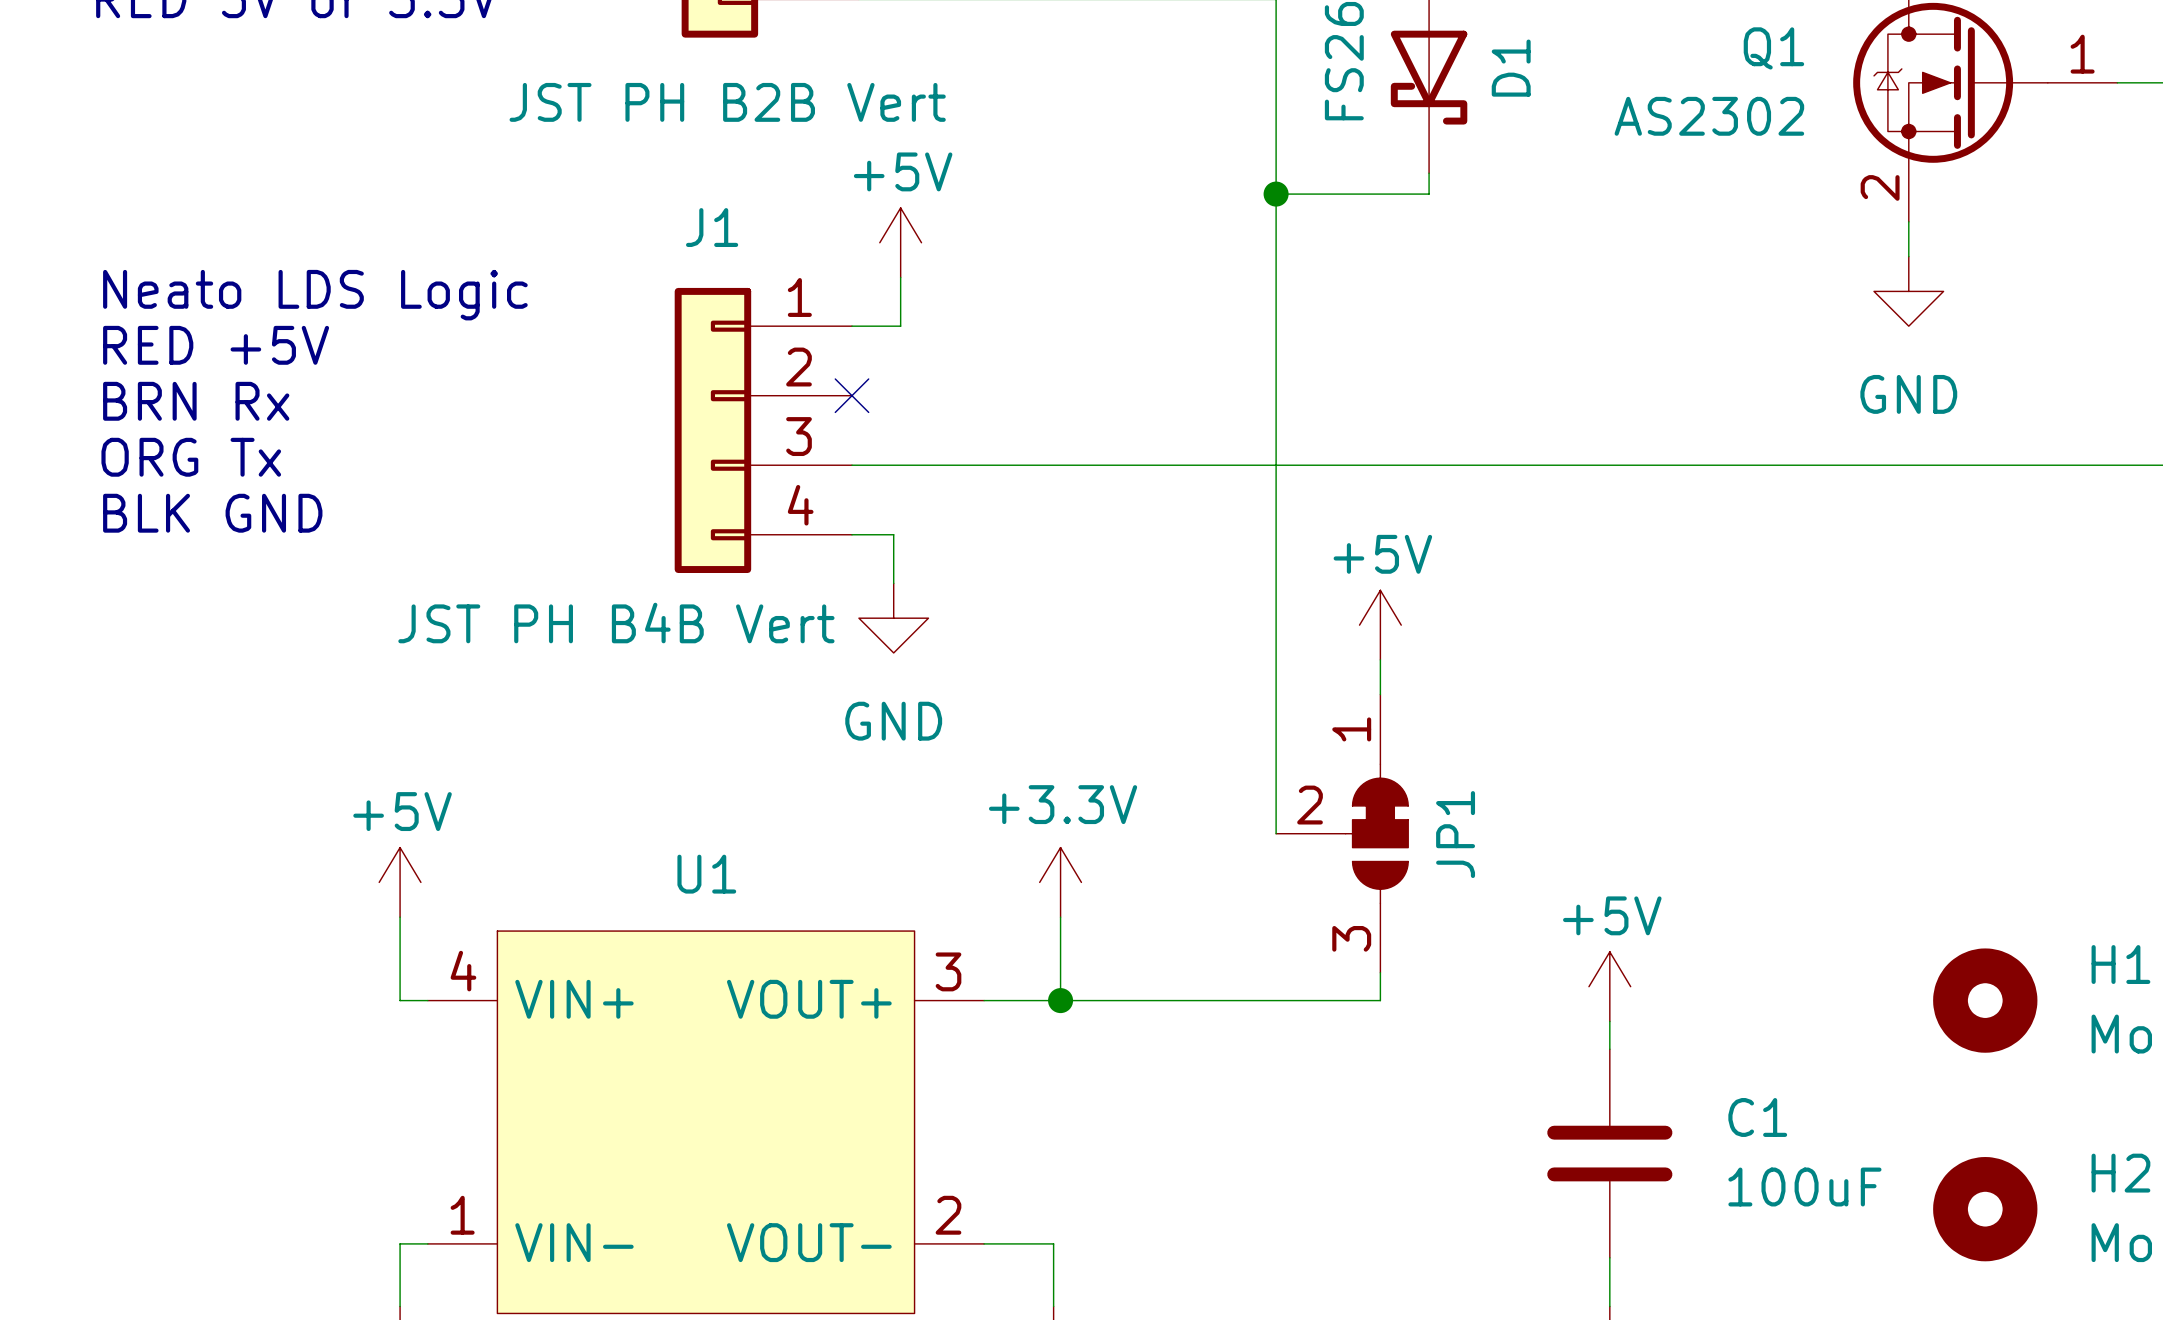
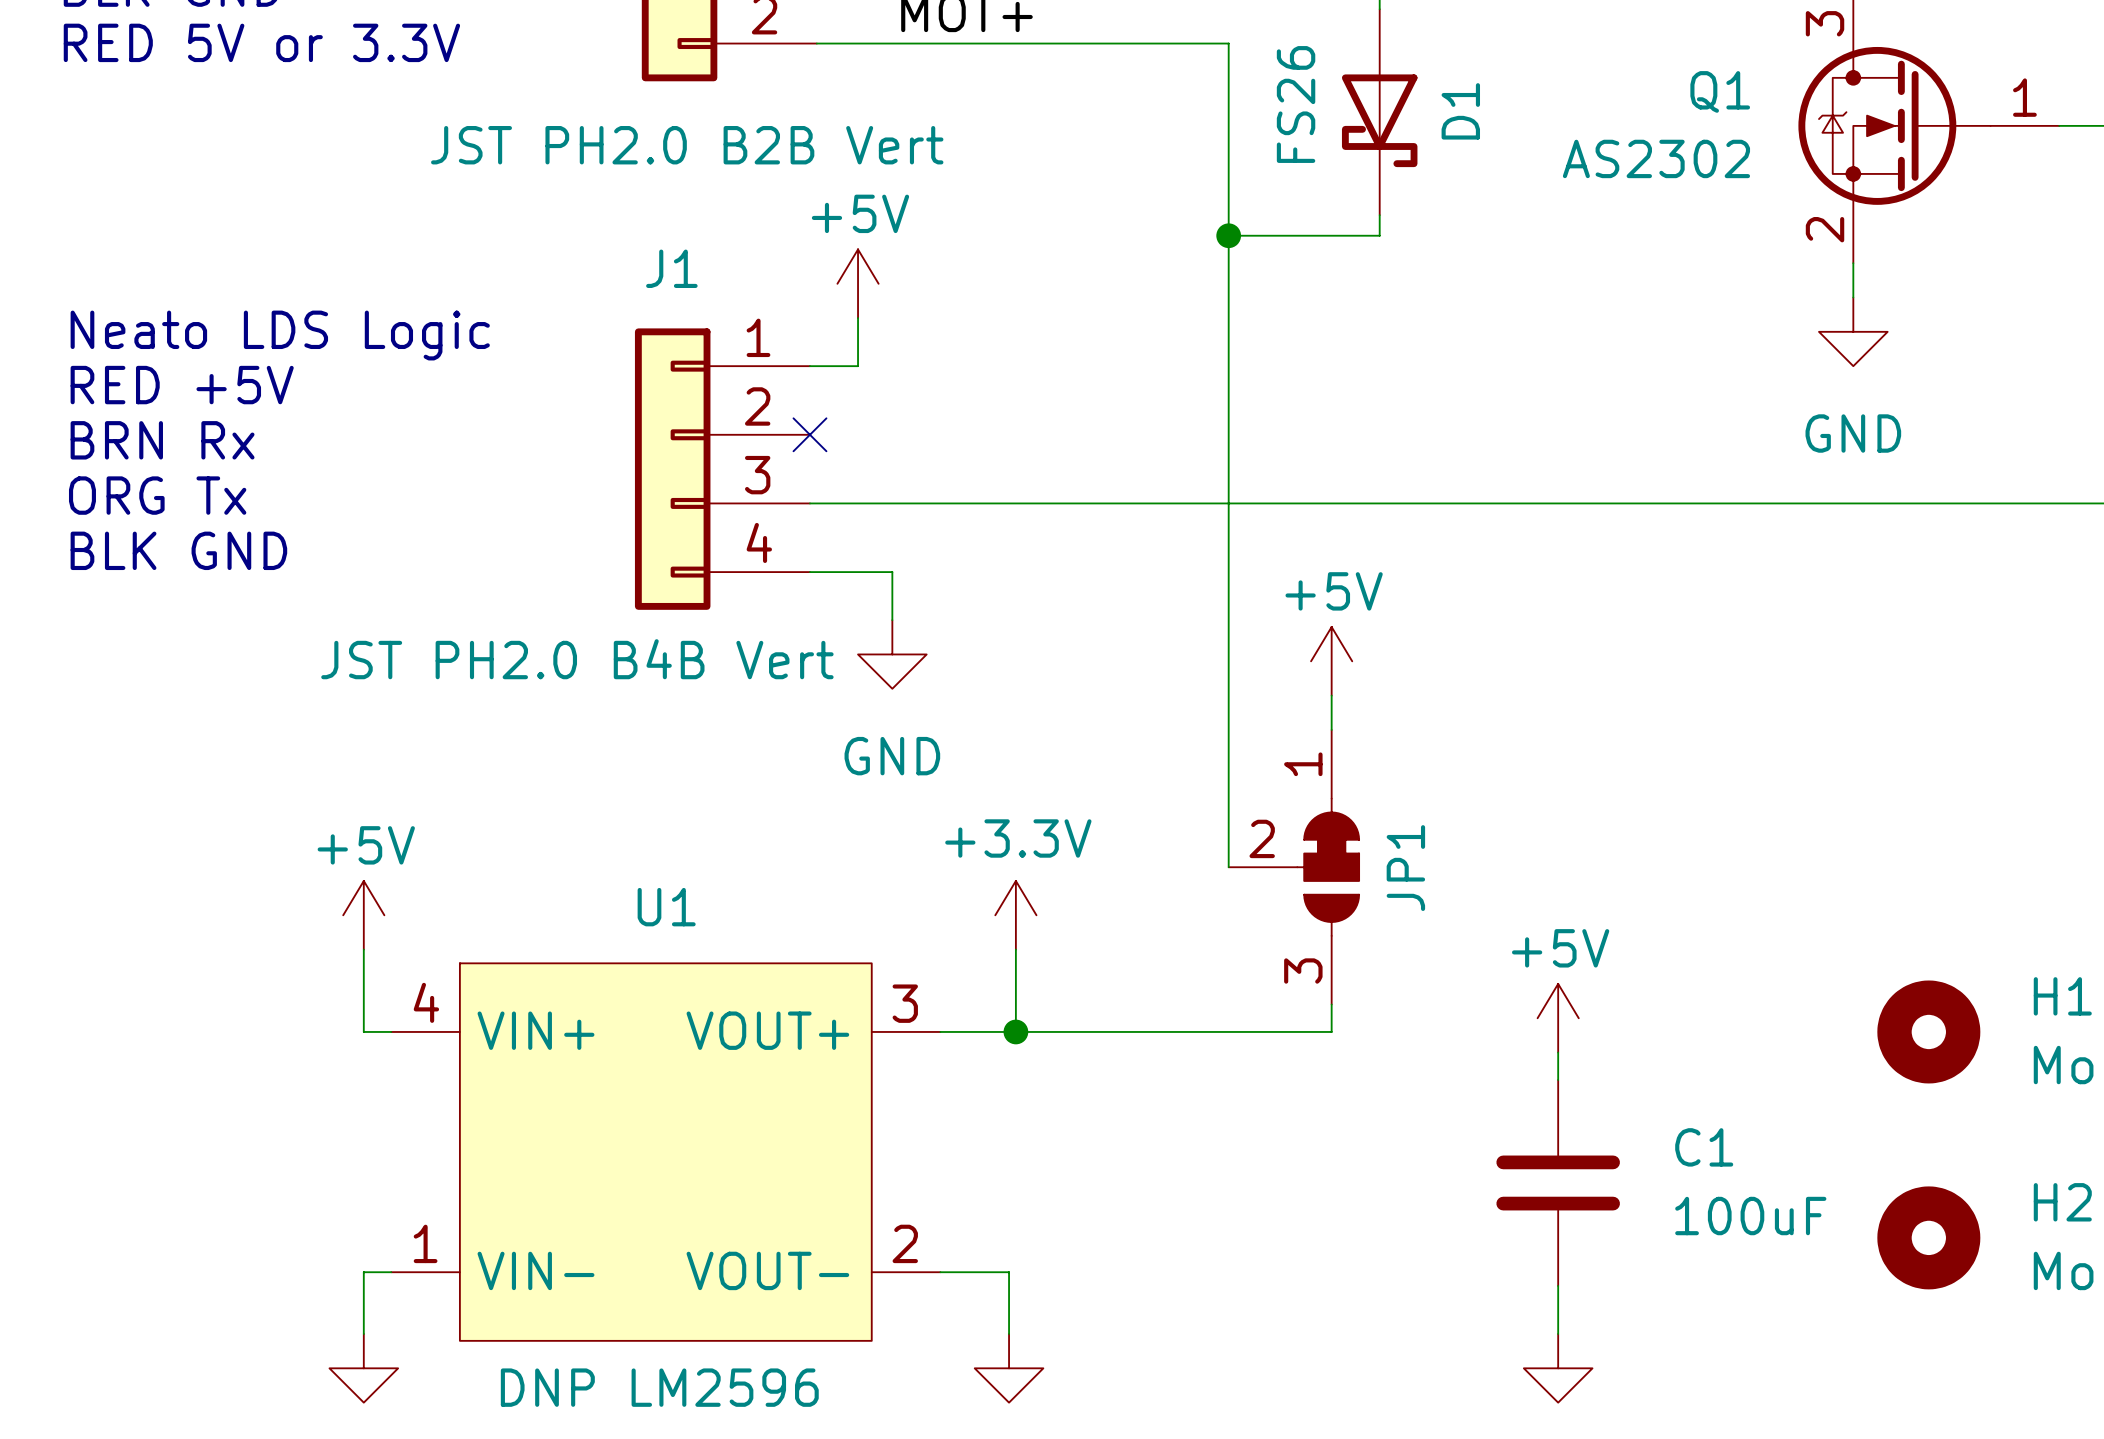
part value: JST PH B2B Vert (727, 102) -> JST PH2.0 B2B Vert (687, 145)
wire: (893, 534) (893, 583) -> (851, 572) (892, 572) (892, 620)
power symbol position: GND (893, 618) -> GND (892, 654)
J1 value: JST PH B4B Vert (616, 623) -> JST PH2.0 B4B Vert (577, 659)

